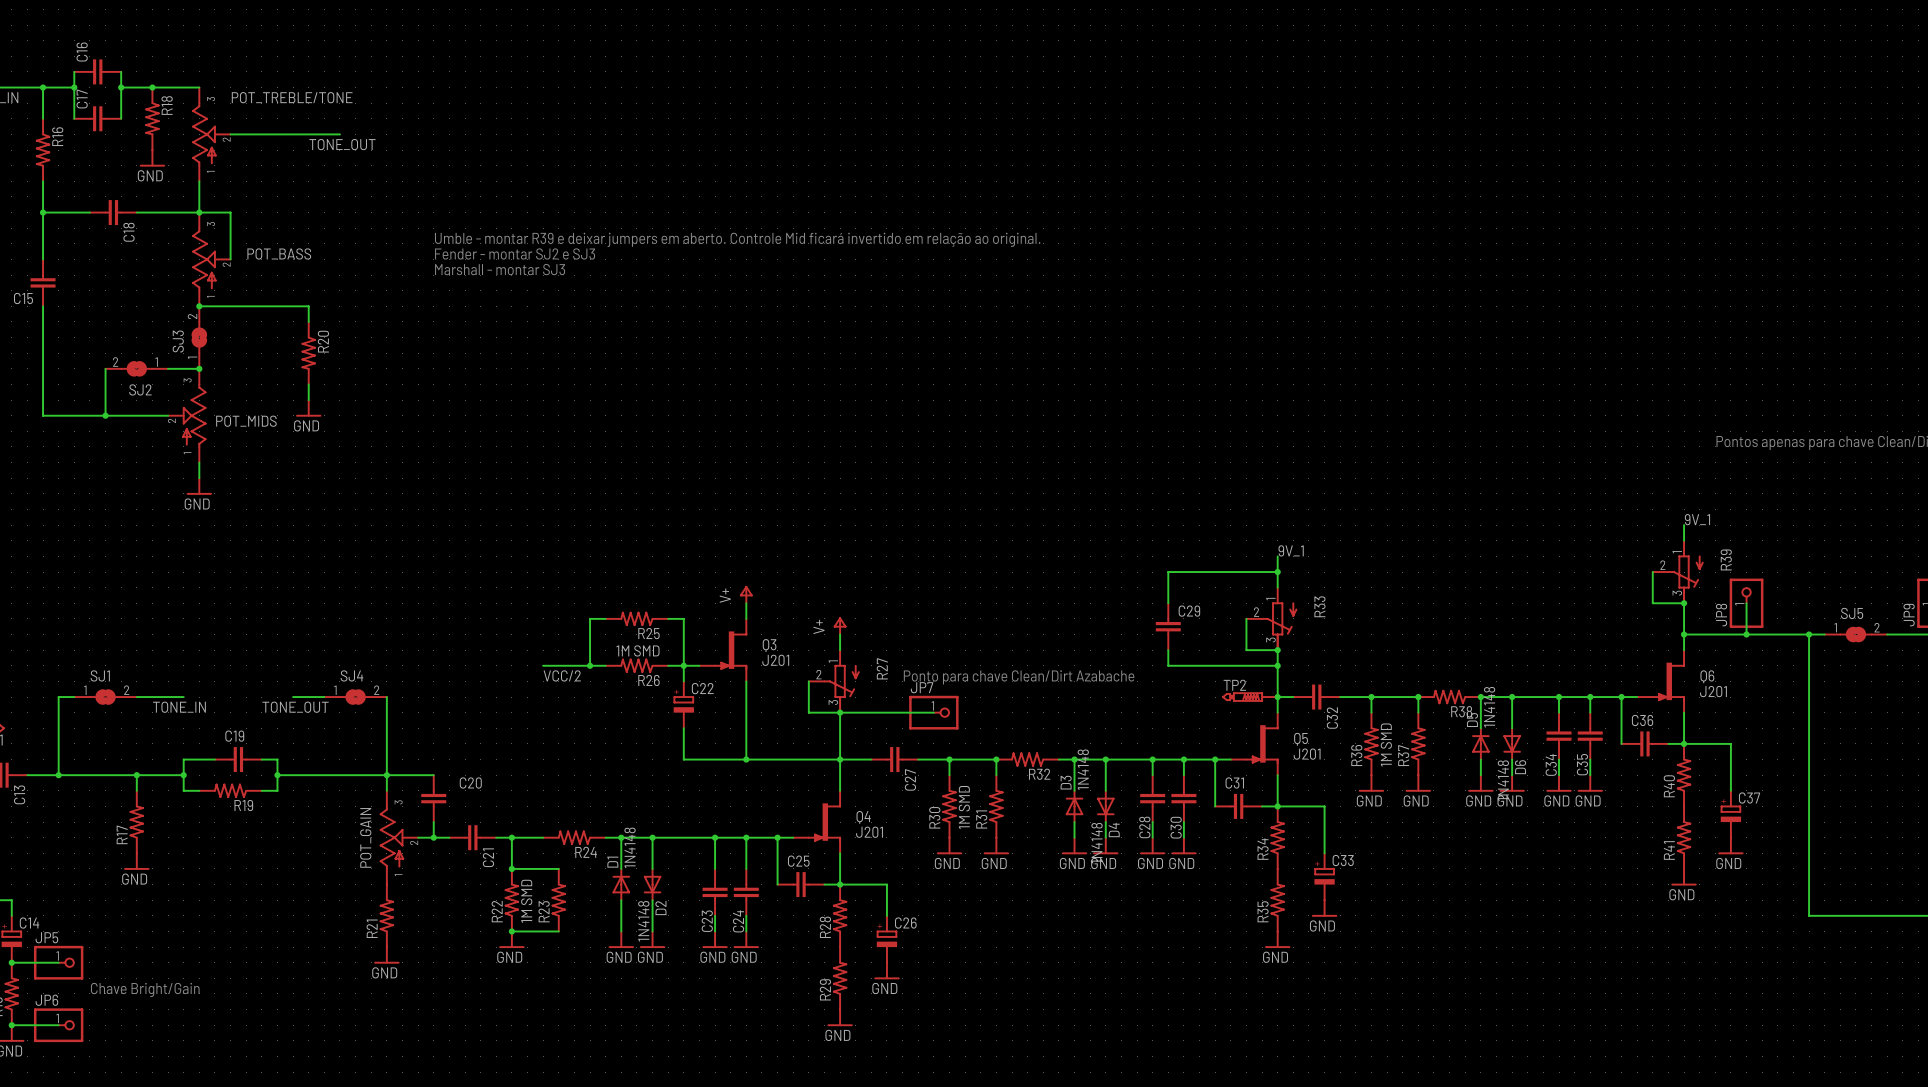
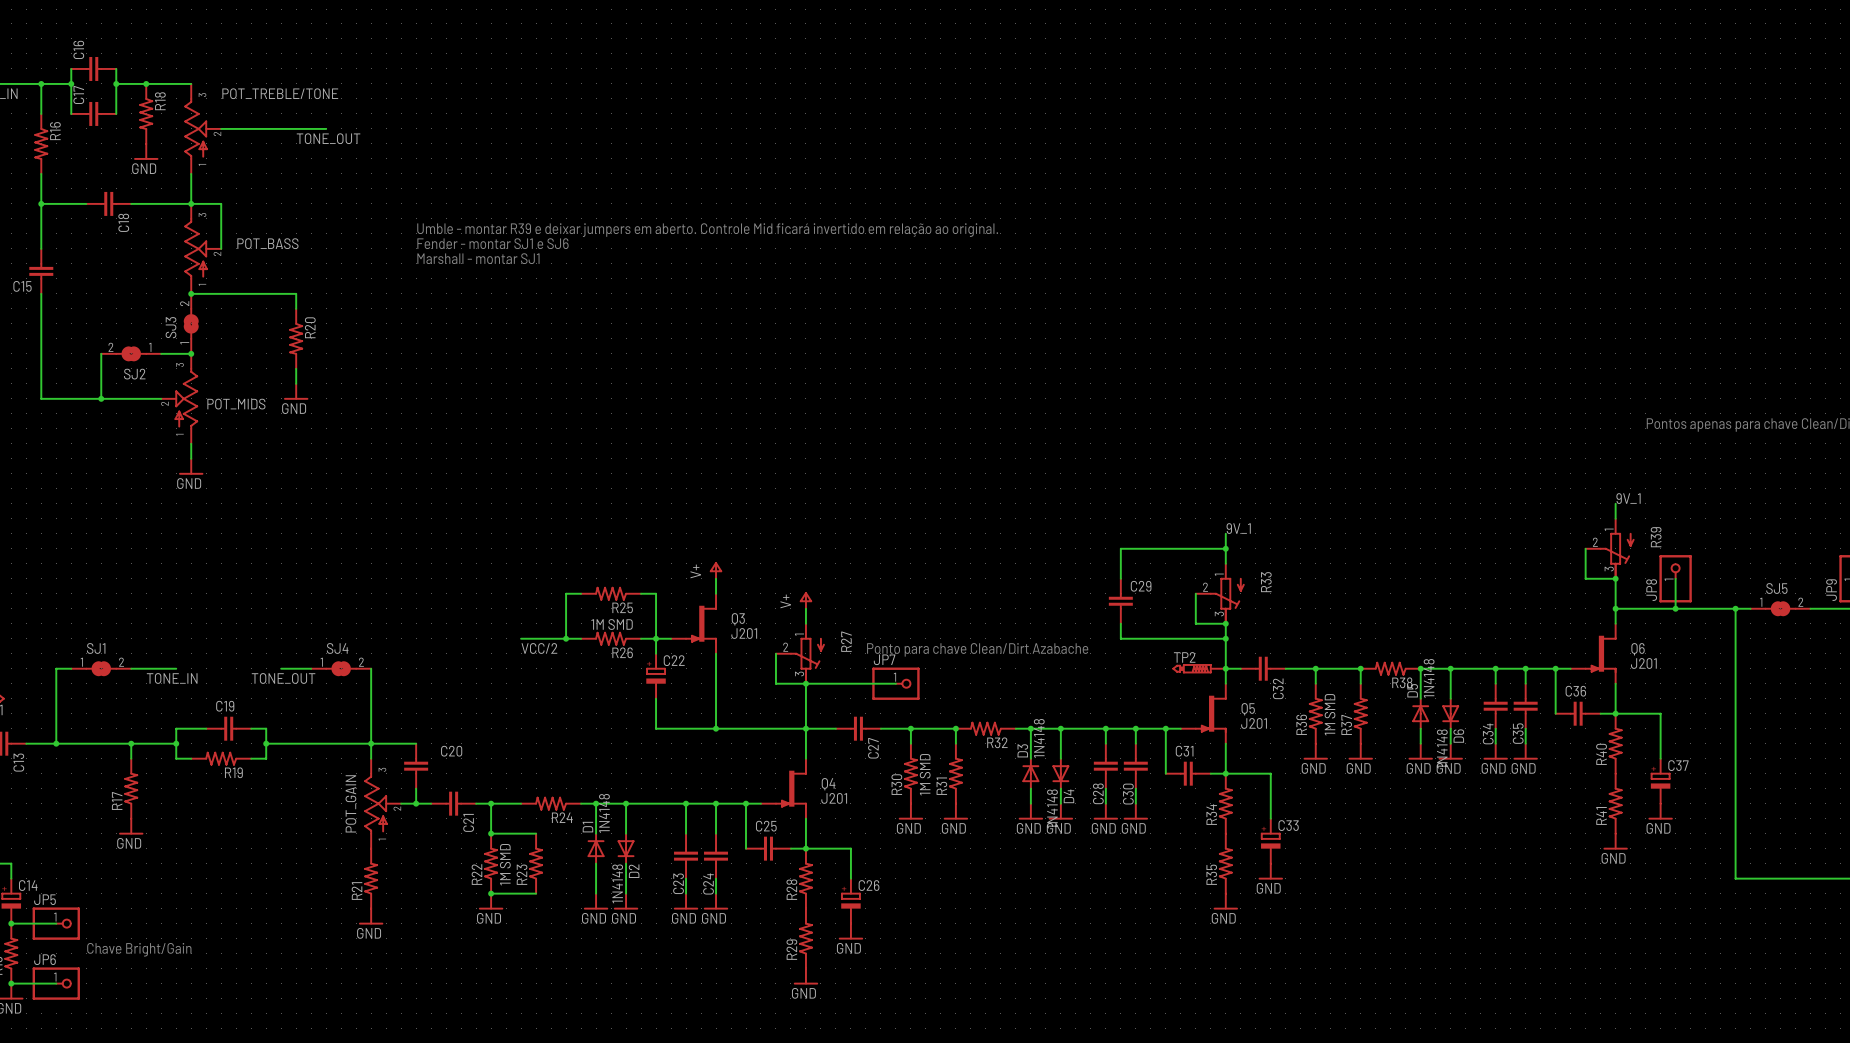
text: Fender - montar SJ2 e SJ3 (515, 253) -> Fender - montar SJ1 e SJ6 (492, 243)
text: Marshall - montar SJ3 (500, 269) -> Marshall - montar SJ1 (478, 258)

